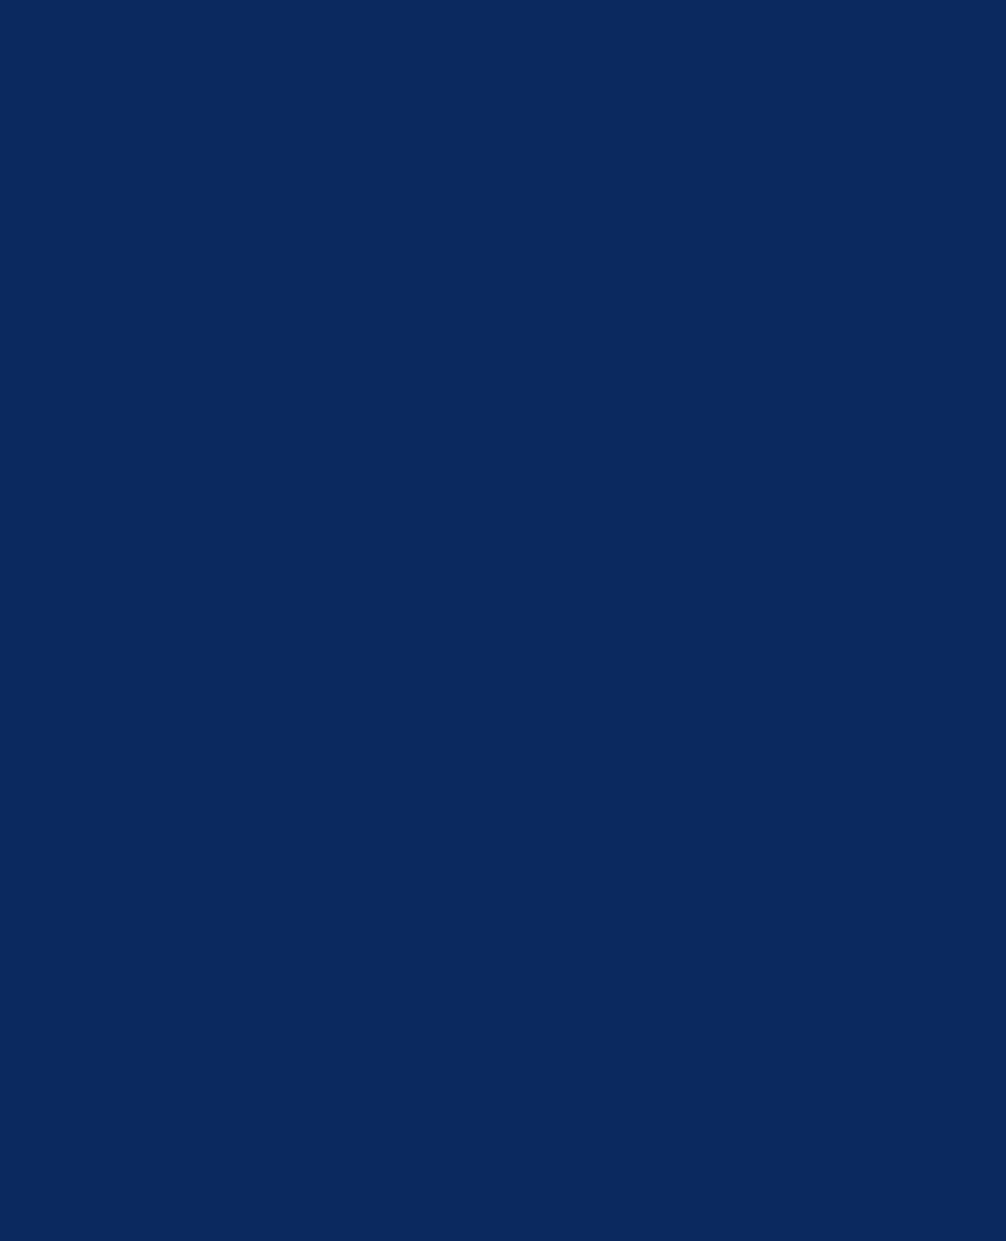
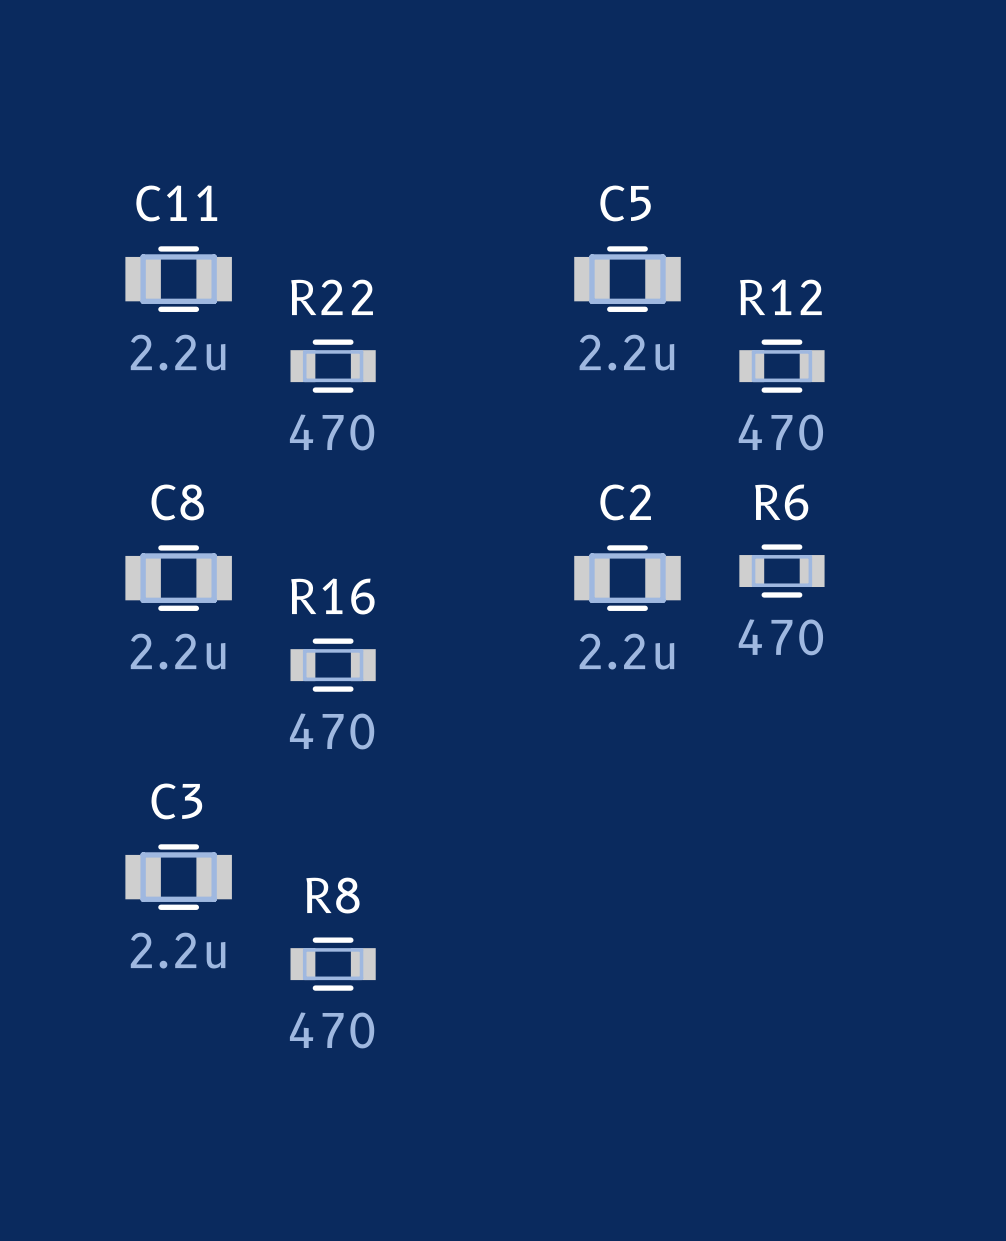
C11: none -> 2.2u (178, 279)
C5: none -> 2.2u (627, 279)
R22: none -> 470 (333, 366)
R12: none -> 470 (781, 366)
R6: none -> 470 (781, 571)
C8: none -> 2.2u (178, 578)
C2: none -> 2.2u (627, 578)
R16: none -> 470 (333, 665)
C3: none -> 2.2u (178, 877)
R8: none -> 470 (333, 964)

